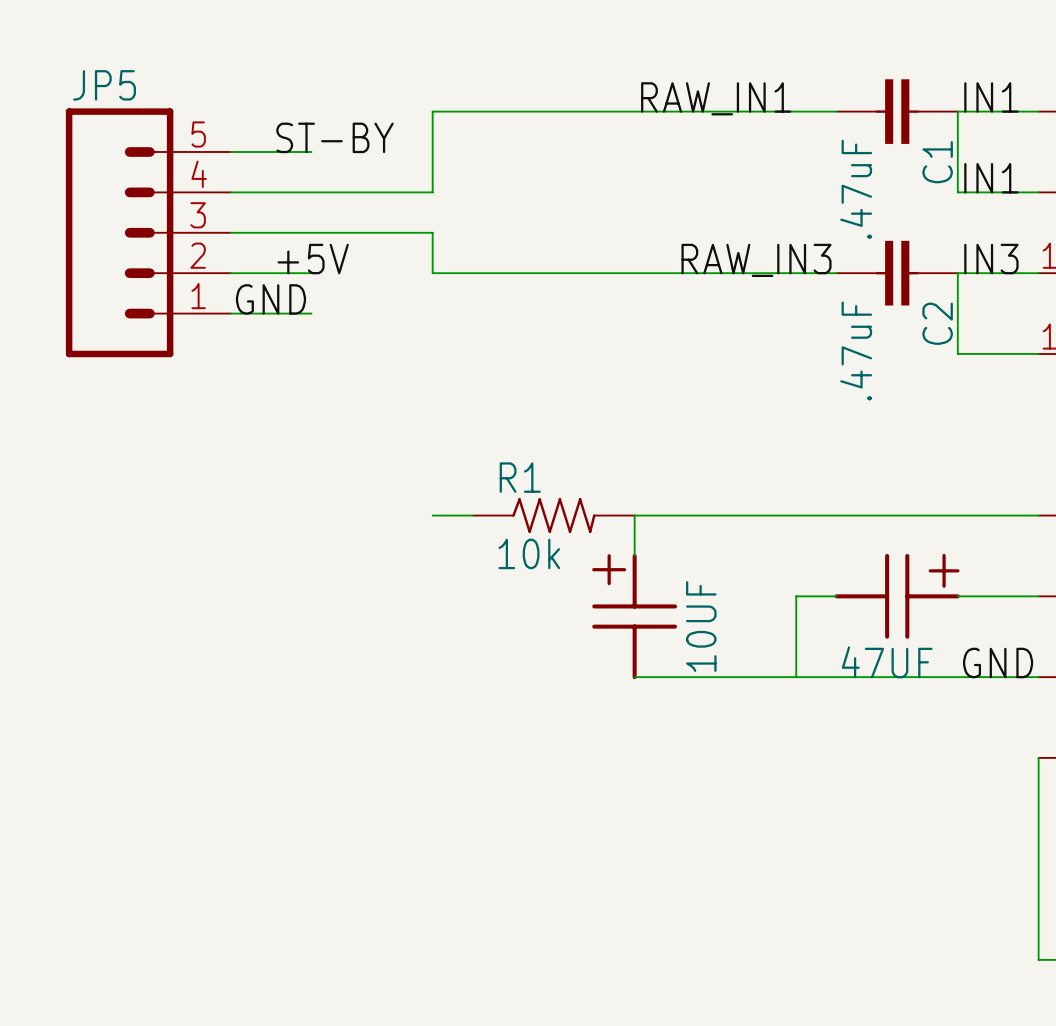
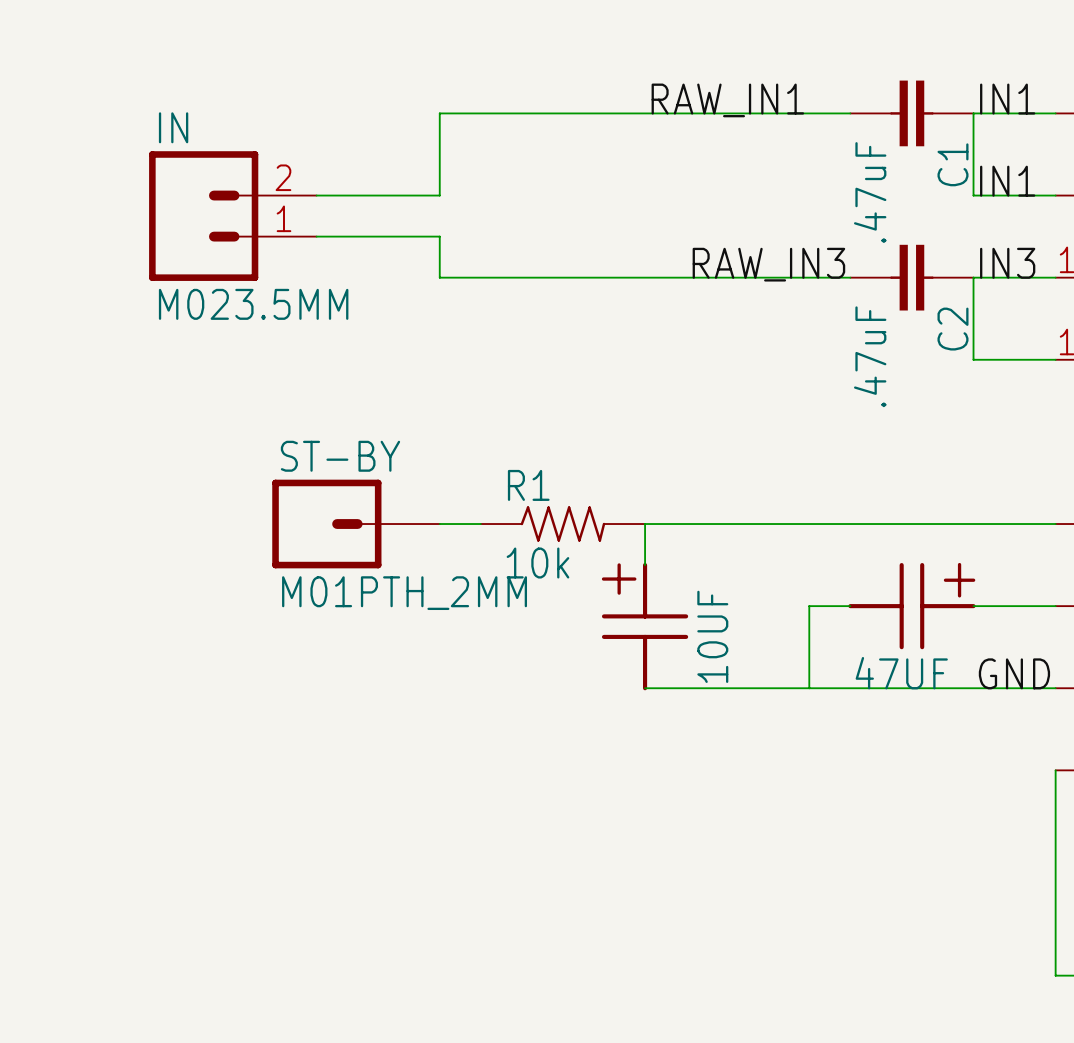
label: ST-BY (334, 137) -> none
wire: (230, 151) (311, 151) -> none
IN: none -> M023.5MM (232, 216)
JP5: (148, 232) -> none
label: +5V (313, 259) -> none
wire: (230, 273) (311, 273) -> none
label: GND (270, 299) -> none
wire: (230, 313) (311, 313) -> none
ST-BY: none -> M01PTH_2MM (356, 524)

